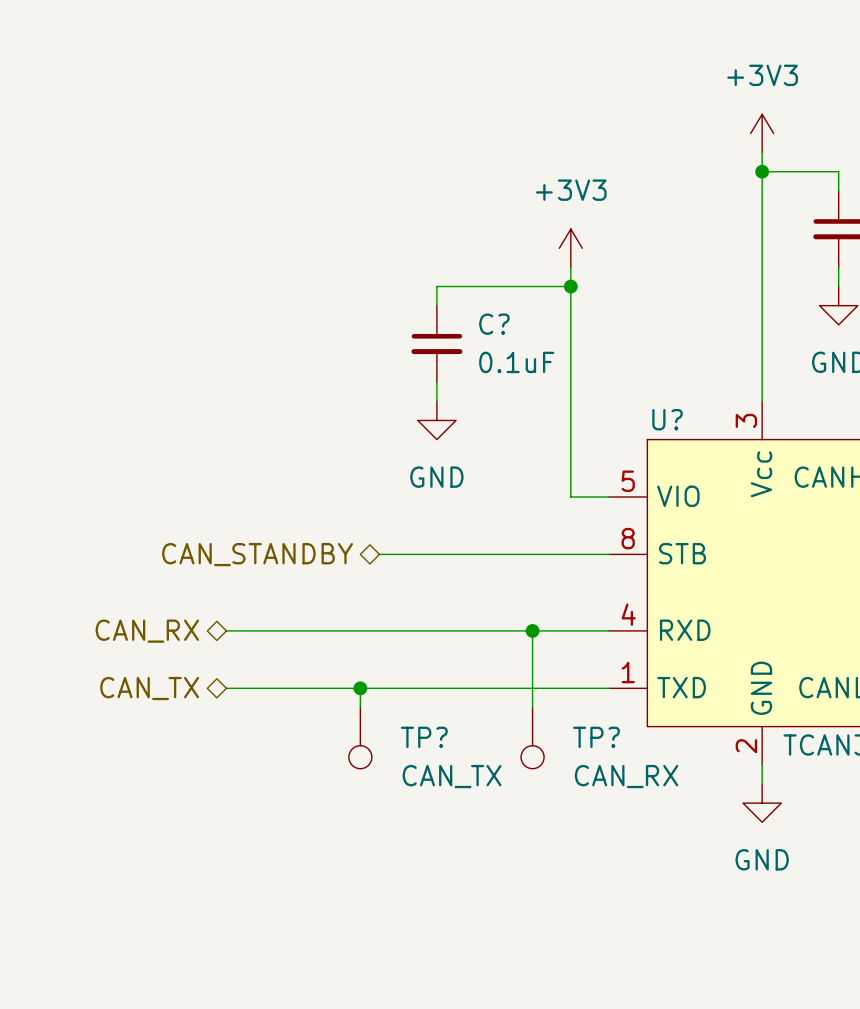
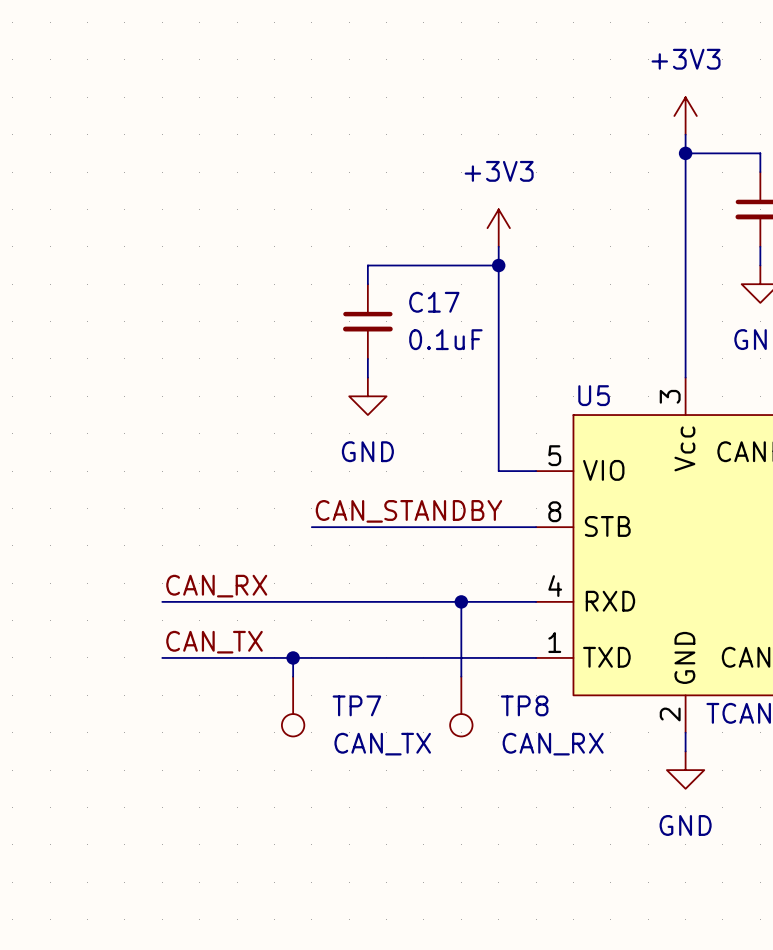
C? name: C? (494, 324) -> C17 (434, 302)
U? name: U? (667, 419) -> U5 (594, 395)
label: none -> CAN_STANDBY (408, 511)
hierarchical label: CAN_STANDBY (257, 554) -> none
label: none -> CAN_RX (216, 586)
hierarchical label: CAN_RX (147, 631) -> none
label: none -> CAN_TX (214, 642)
hierarchical label: CAN_TX (149, 688) -> none
TP? name: TP? (424, 737) -> TP7 (356, 705)
TP? name: TP? (596, 737) -> TP8 (524, 705)

